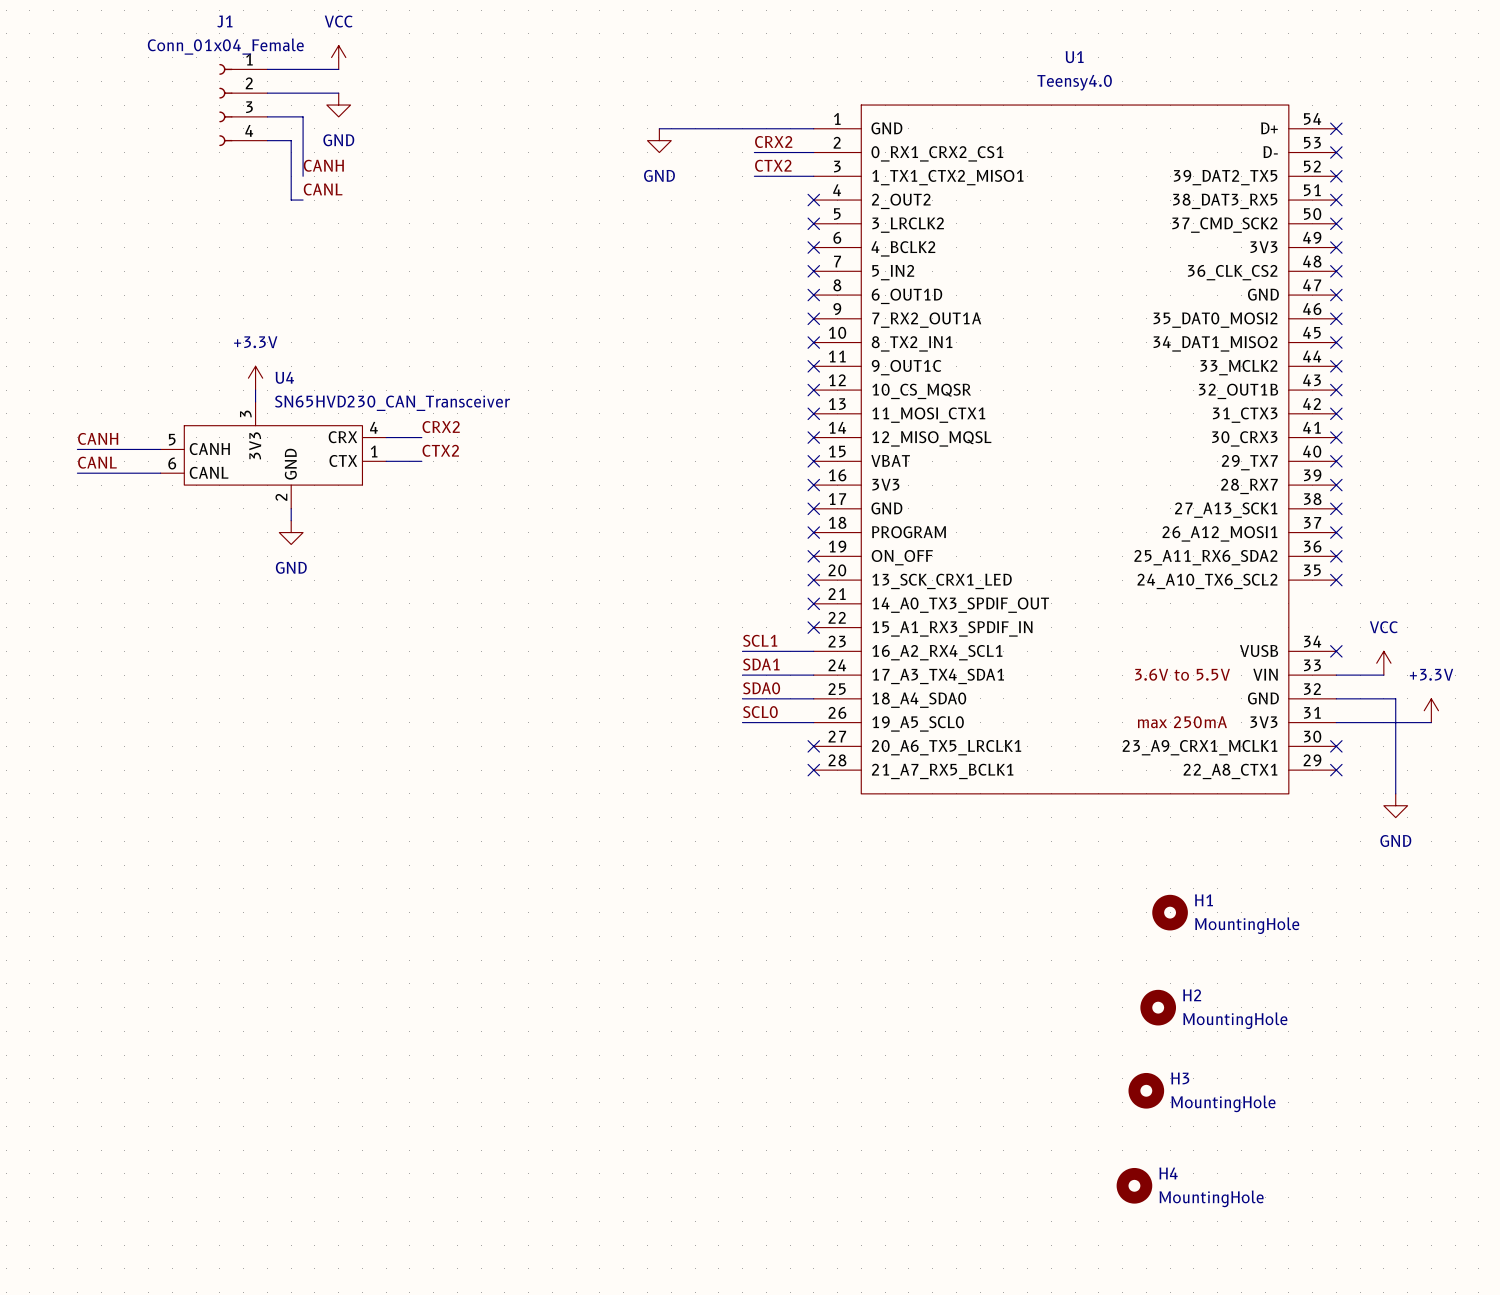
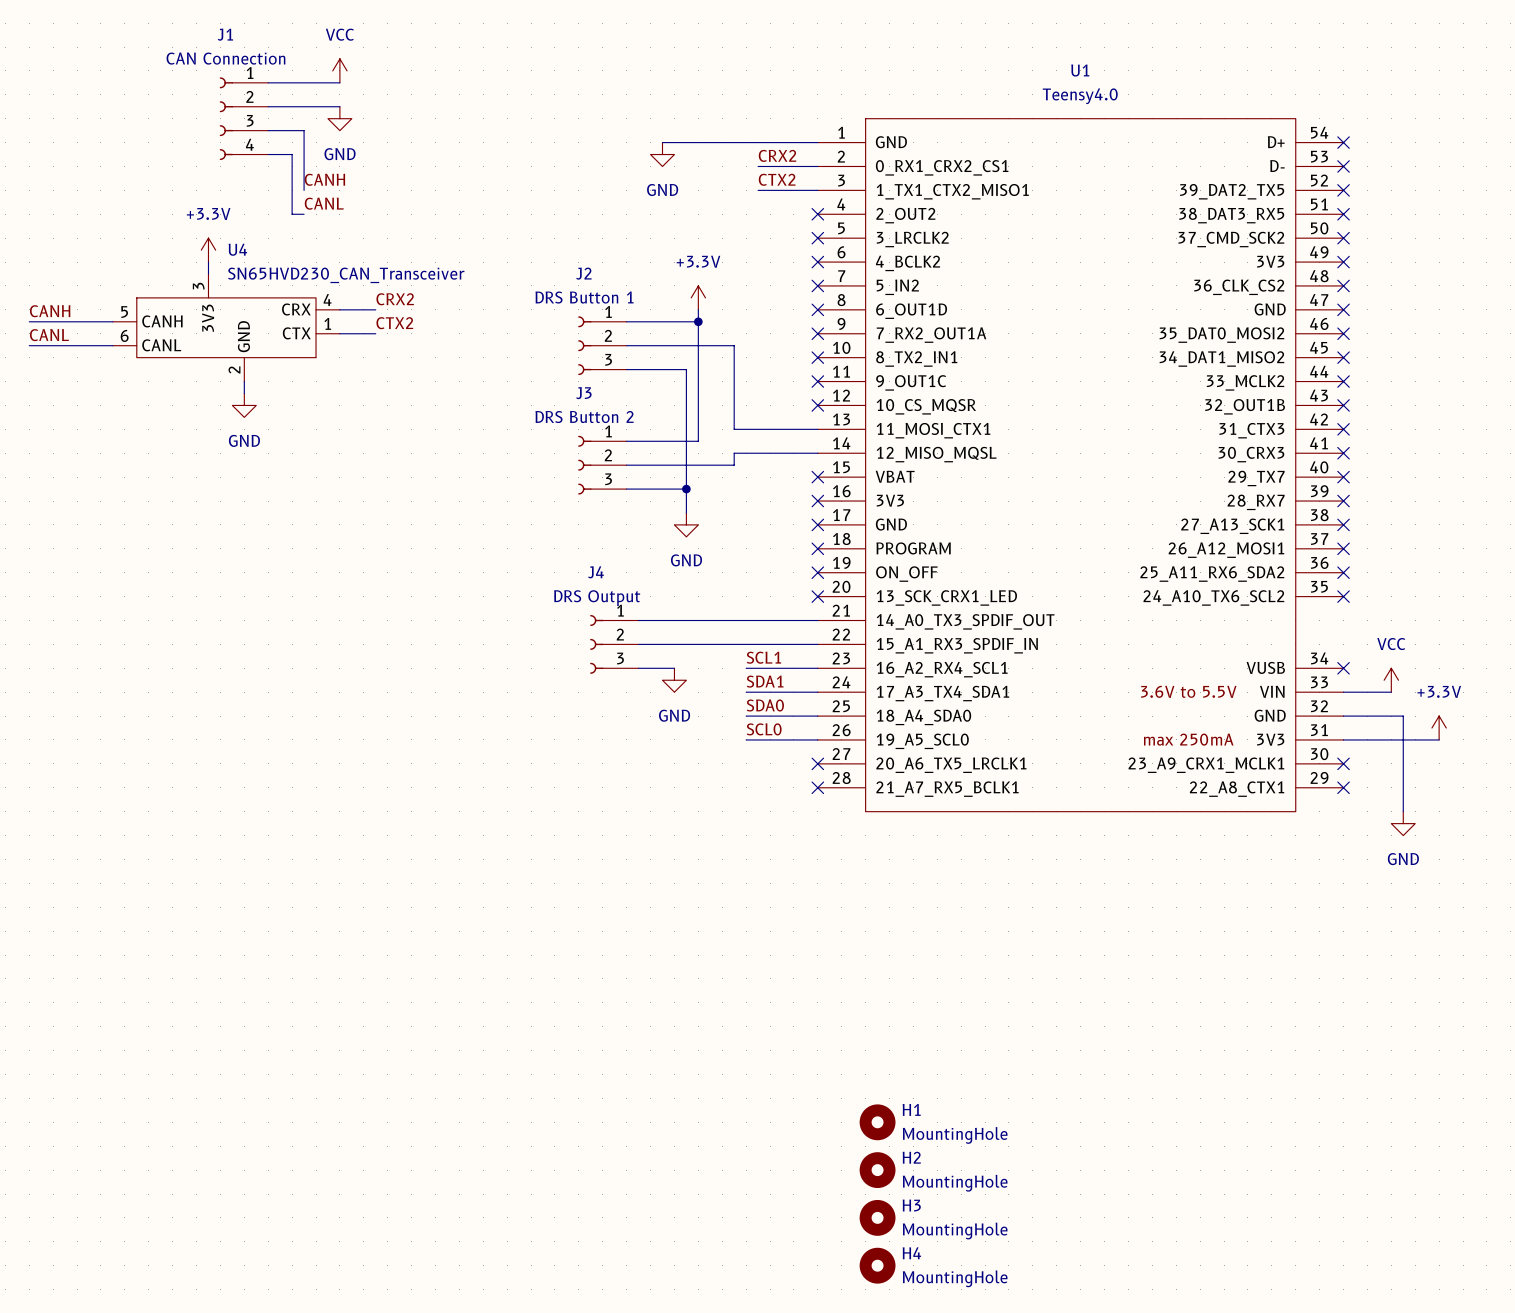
J1 value: Conn_01x04_Female (225, 46) -> CAN Connection (225, 58)
power symbol: none -> +3.3V (698, 297)
wire: none -> (698, 309) (698, 441) (626, 441)
wire: none -> (626, 321) (698, 321)
junction: none -> (698, 321)
J2: none -> DRS Button 1 (602, 345)
wire: none -> (626, 345) (734, 345) (734, 429) (817, 429)
wire: none -> (626, 369) (686, 369) (686, 512)
power symbol position: +3.3V (255, 378) -> +3.3V (208, 250)
wire: (255, 390) (255, 401) -> (208, 262) (208, 274)
no-connect mark: (813, 413) -> none
label position: CRX2 (441, 427) -> CRX2 (395, 299)
wire: (386, 437) (421, 437) -> (339, 309) (375, 309)
wire: none -> (817, 453) (734, 453) (734, 465) (626, 465)
no-connect mark: (813, 437) -> none
label position: CANH (98, 438) -> CANH (50, 311)
wire: (77, 449) (160, 449) -> (29, 321) (112, 321)
J3: none -> DRS Button 2 (602, 465)
label position: CTX2 (440, 450) -> CTX2 (394, 323)
U4 position: (273, 455) -> (226, 327)
wire: (386, 461) (421, 461) -> (339, 333) (375, 333)
label position: CANL (97, 462) -> CANL (49, 335)
wire: (77, 473) (160, 473) -> (29, 345) (112, 345)
wire: none -> (626, 489) (686, 489)
junction: none -> (686, 489)
wire: (291, 508) (291, 520) -> (244, 381) (244, 393)
power symbol: none -> GND (686, 524)
power symbol position: GND (291, 532) -> GND (244, 405)
wire: none -> (638, 620) (817, 620)
no-connect mark: (813, 603) -> none
J4: none -> DRS Output (614, 644)
wire: none -> (638, 644) (817, 644)
no-connect mark: (813, 627) -> none
wire: none -> (638, 668) (674, 668)
power symbol: none -> GND (674, 680)
H1 position: (1170, 912) -> (877, 1122)
H2 position: (1158, 1007) -> (877, 1170)
H3 position: (1146, 1090) -> (877, 1217)
H4 position: (1134, 1185) -> (877, 1265)

